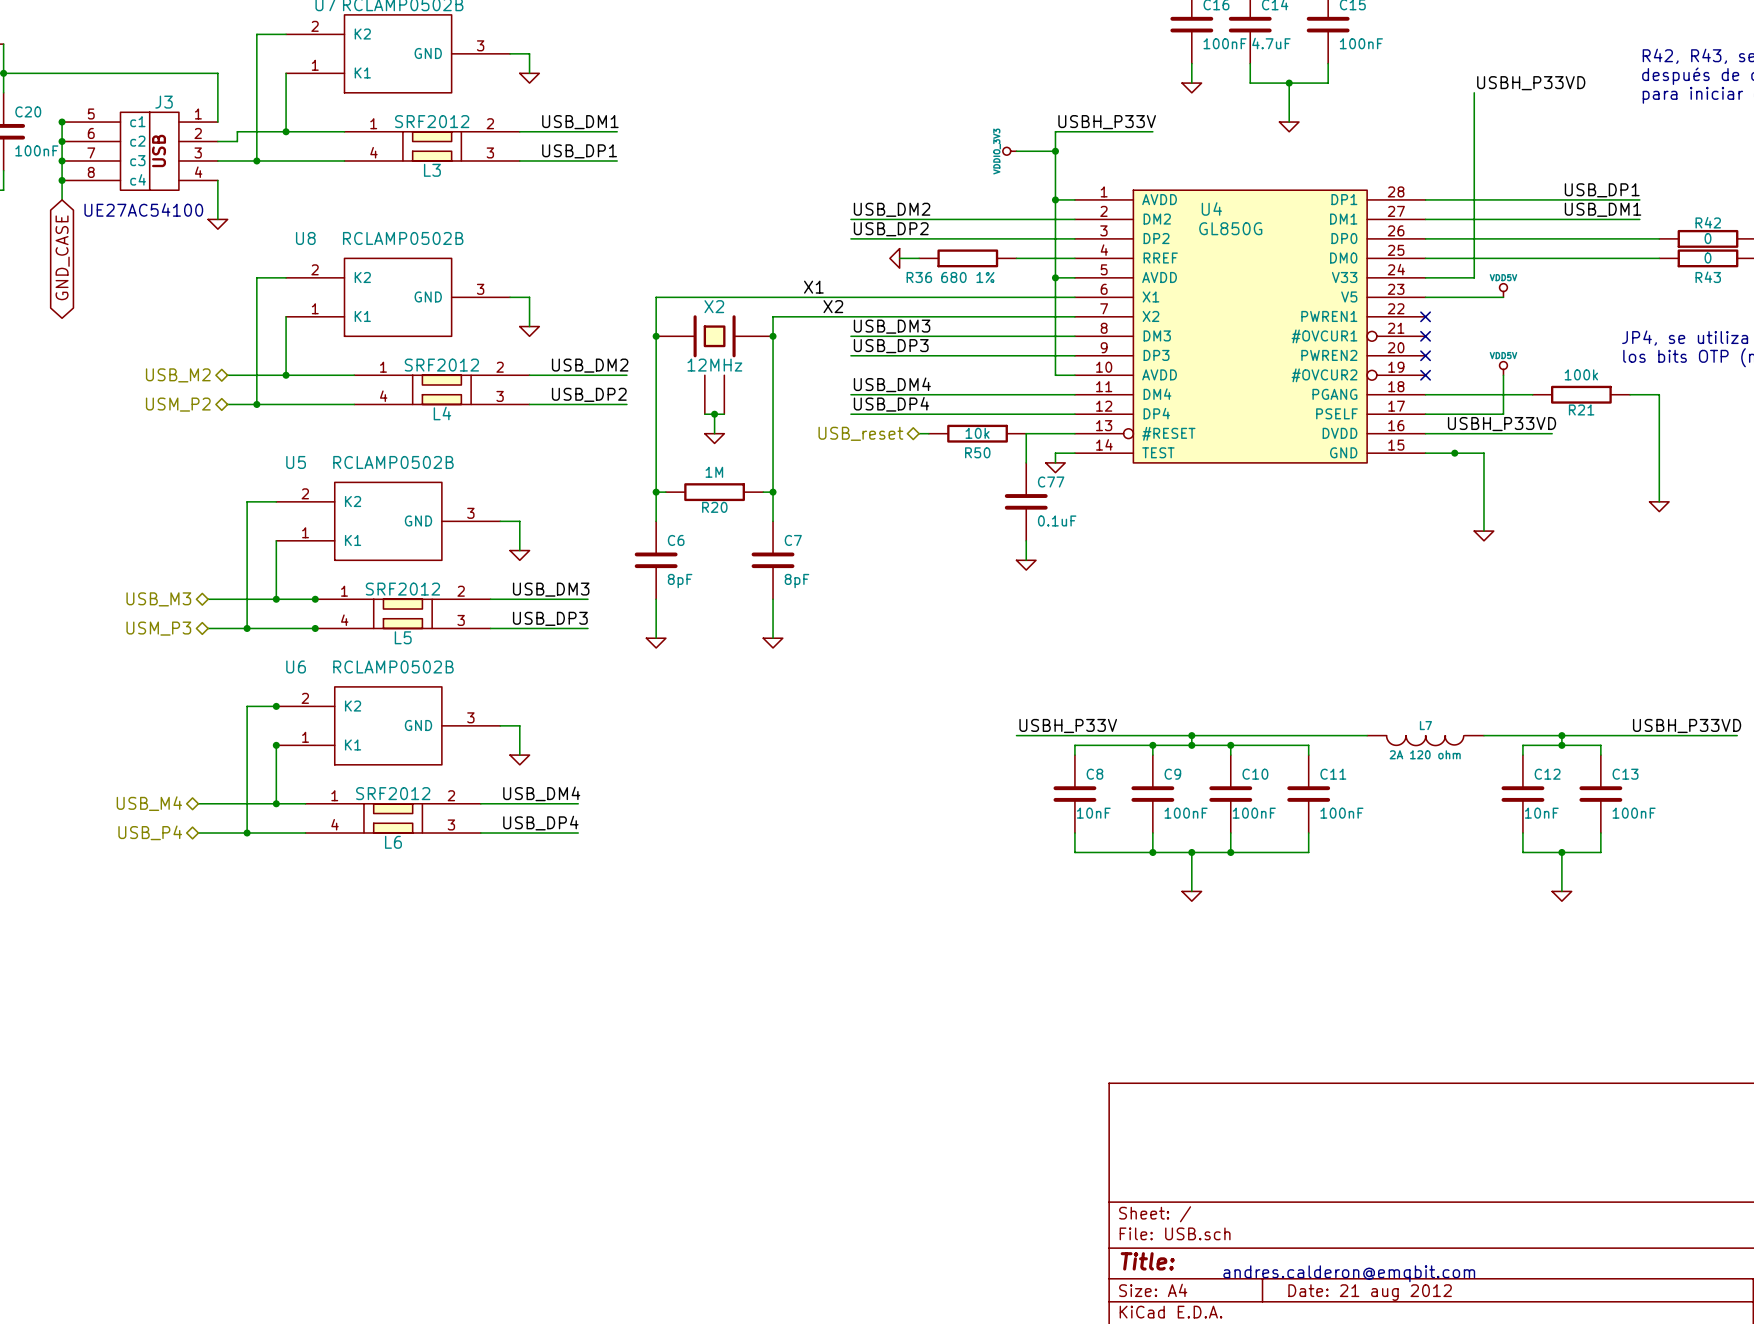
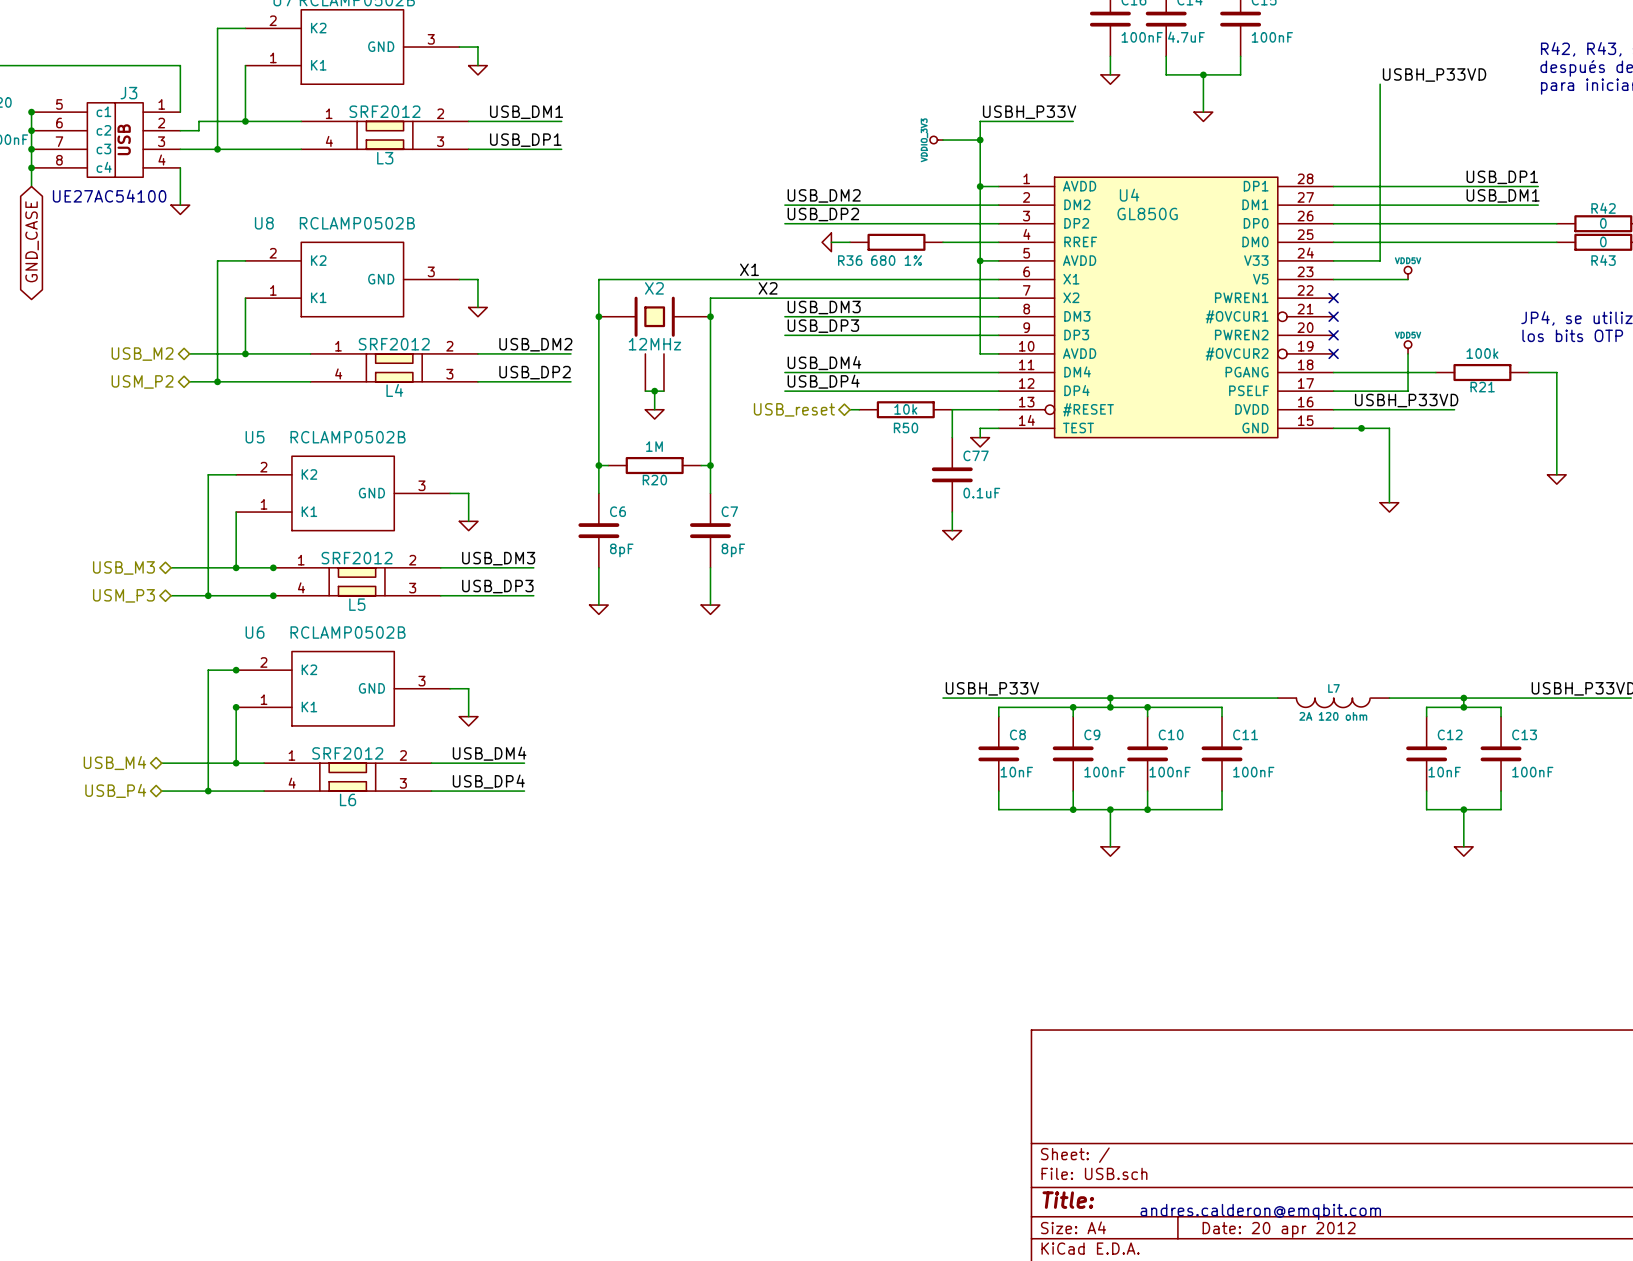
title block: Date: 21 aug 2012 (1370, 1292) -> Date: 20 apr 2012 (1279, 1229)

